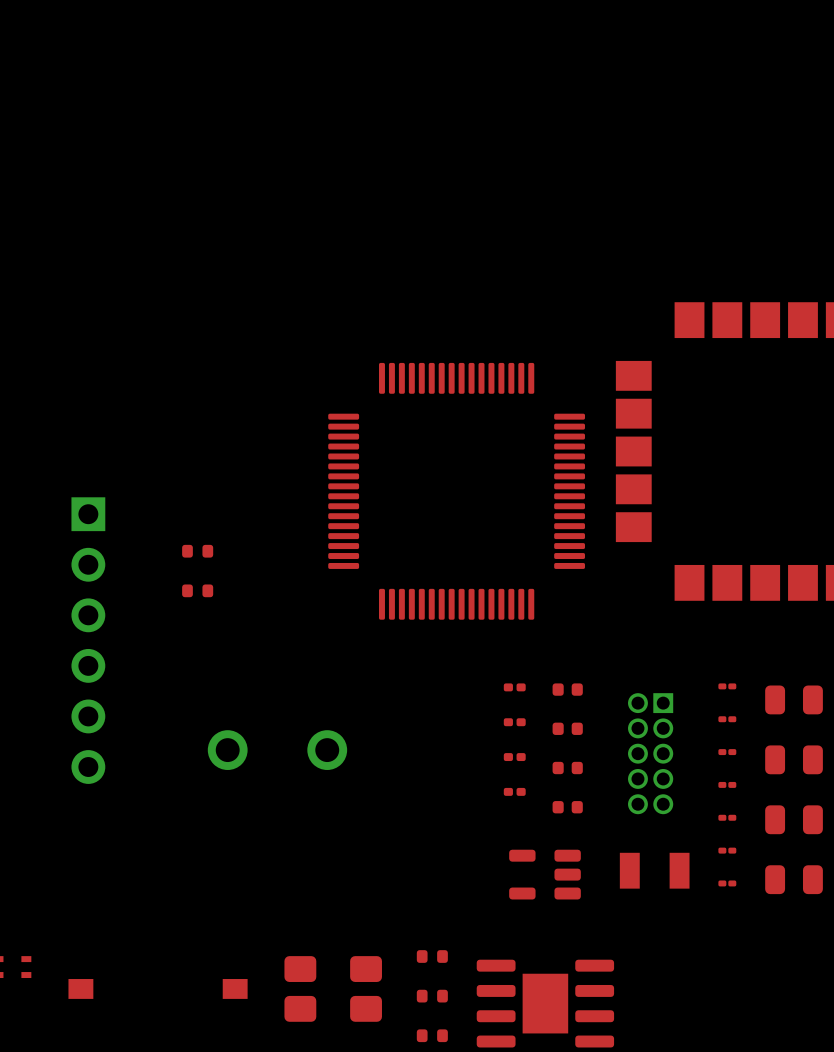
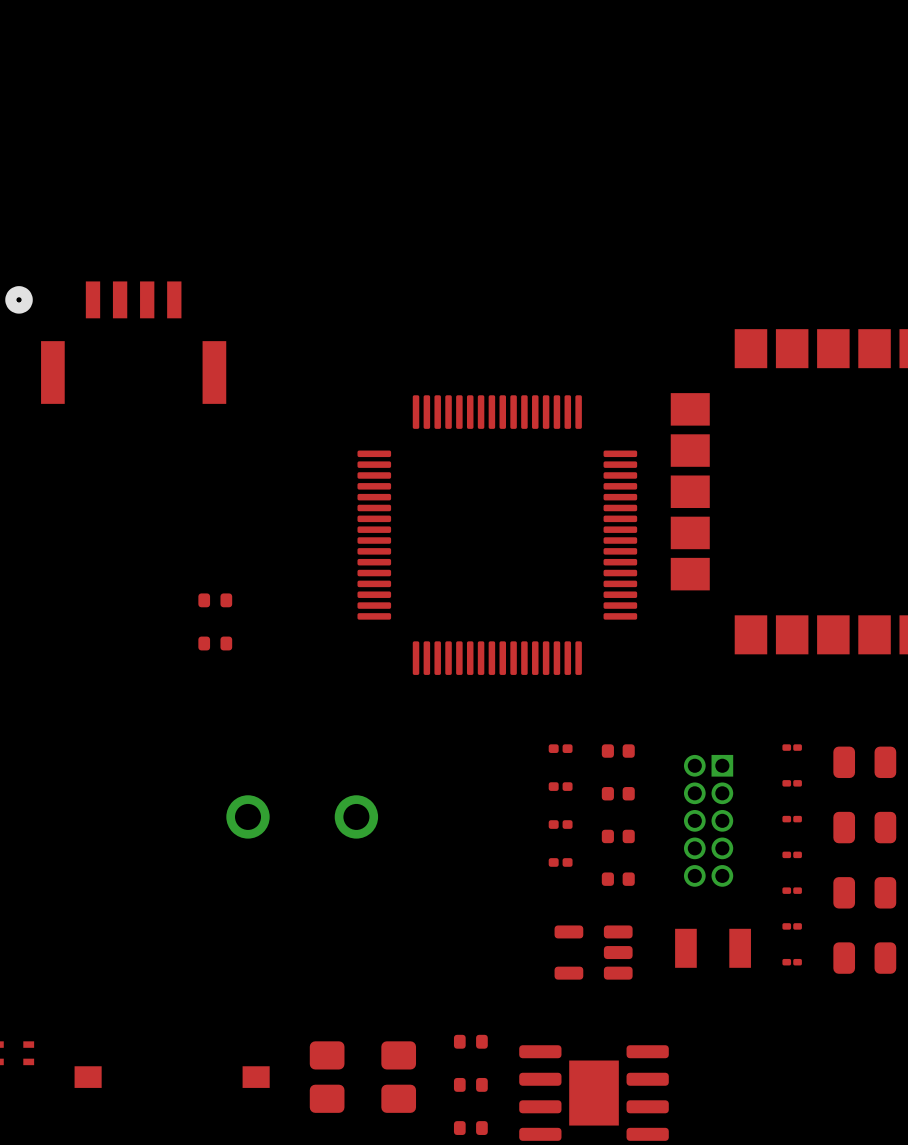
part: none -> (115, 342)
part: (88, 640) -> none

